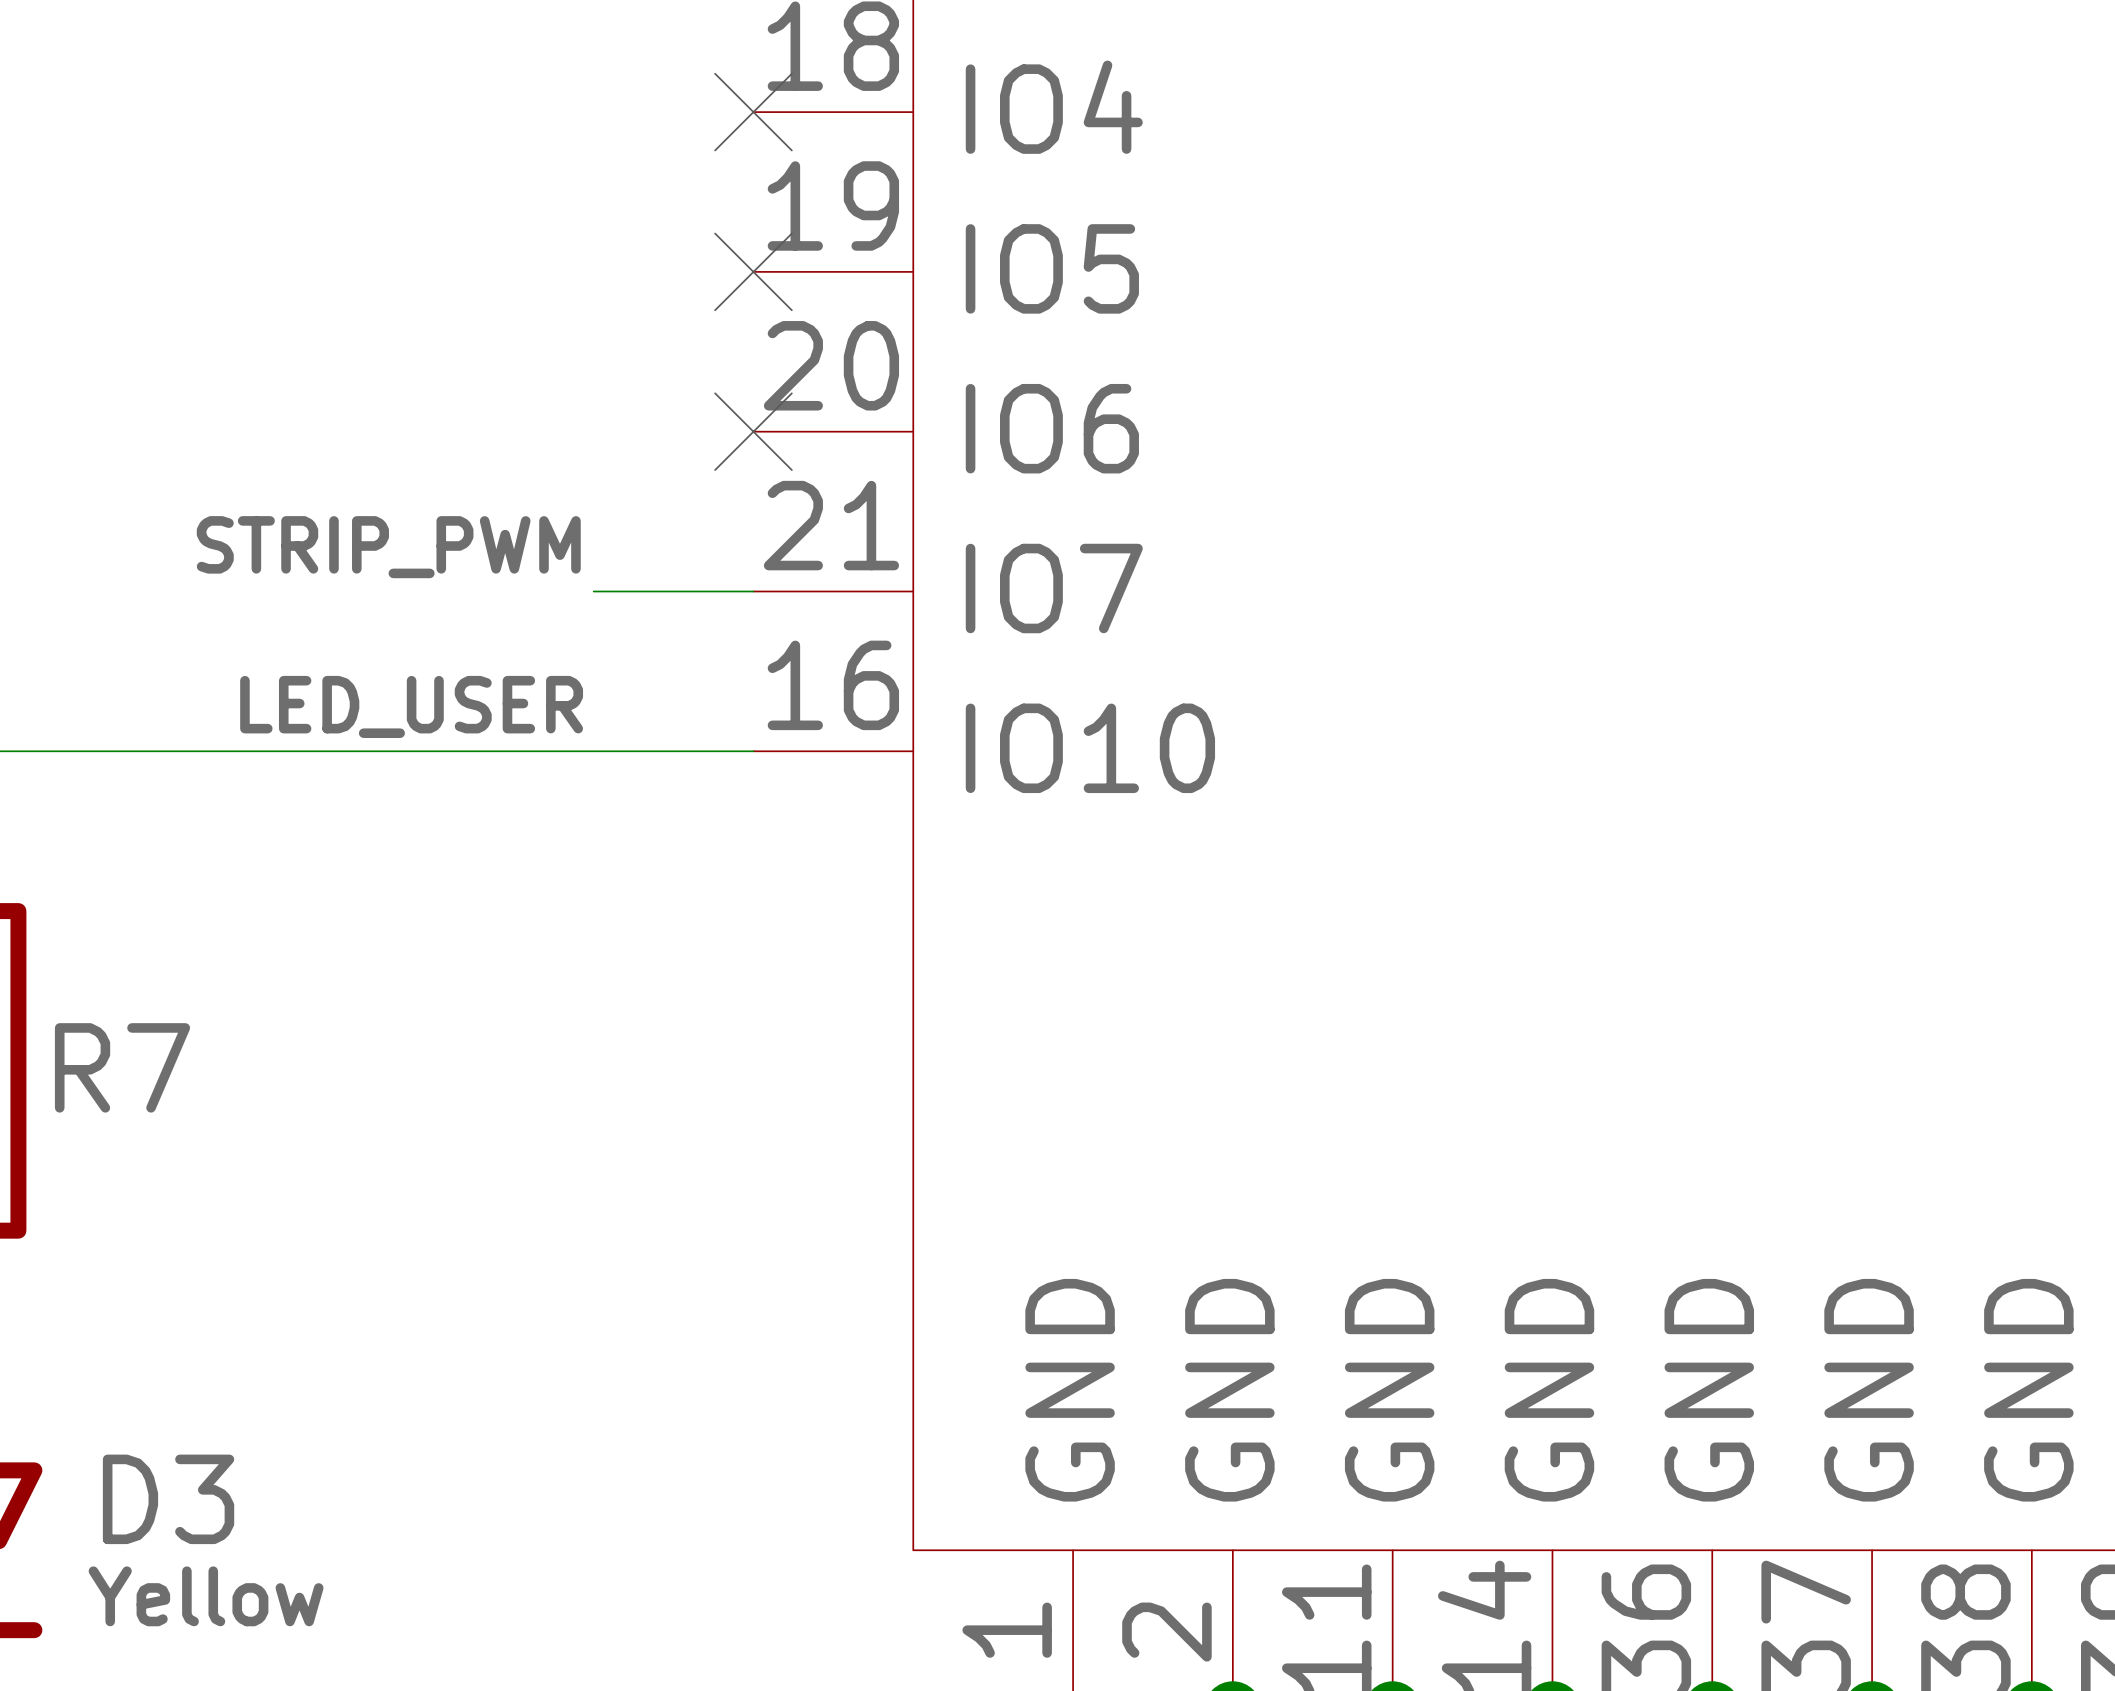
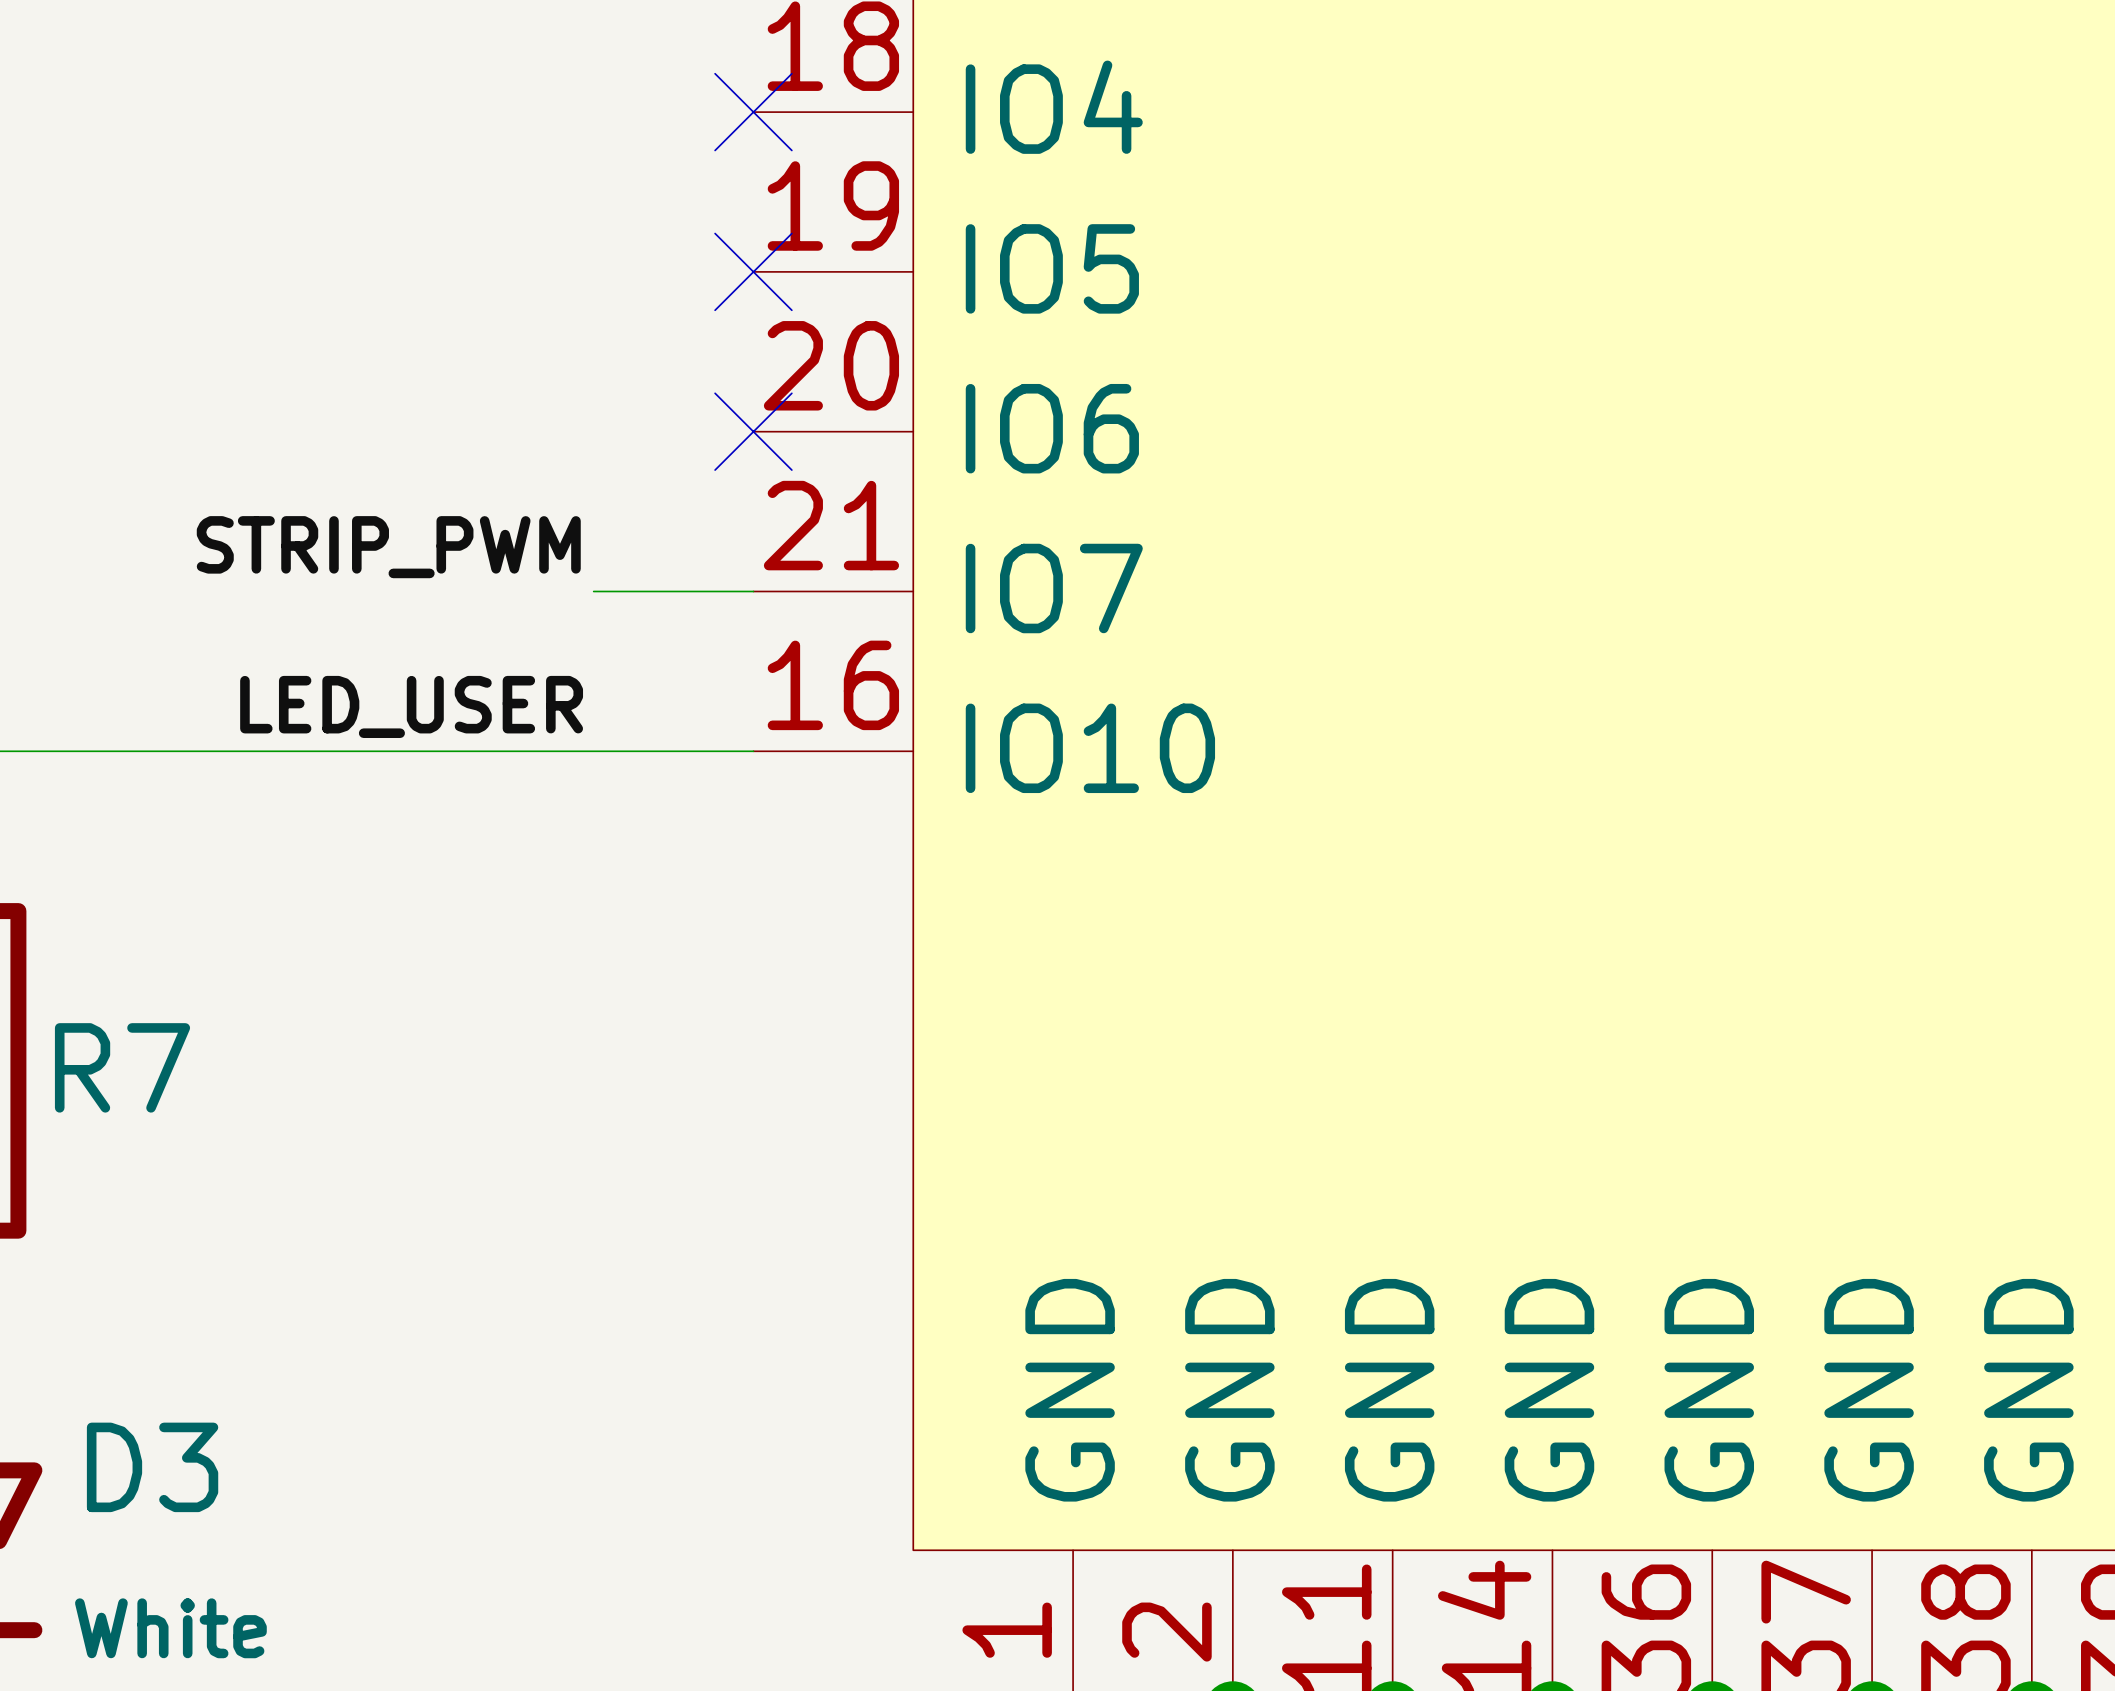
D3 name position: D3 (168, 1499) -> D3 (152, 1467)
D3 value: Yellow (206, 1596) -> White (170, 1628)

